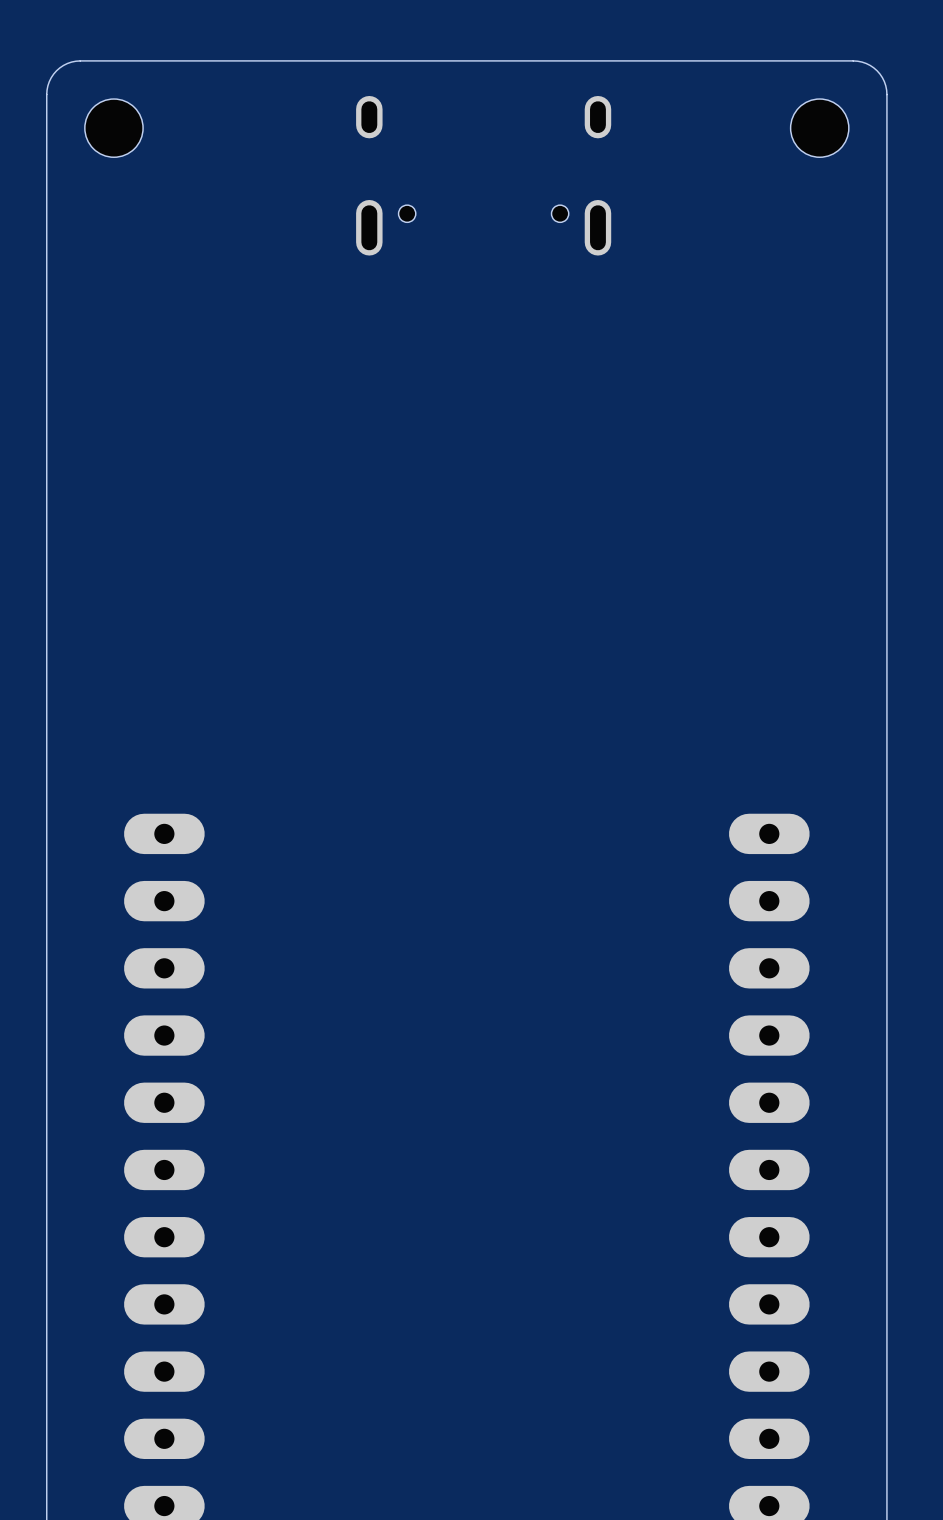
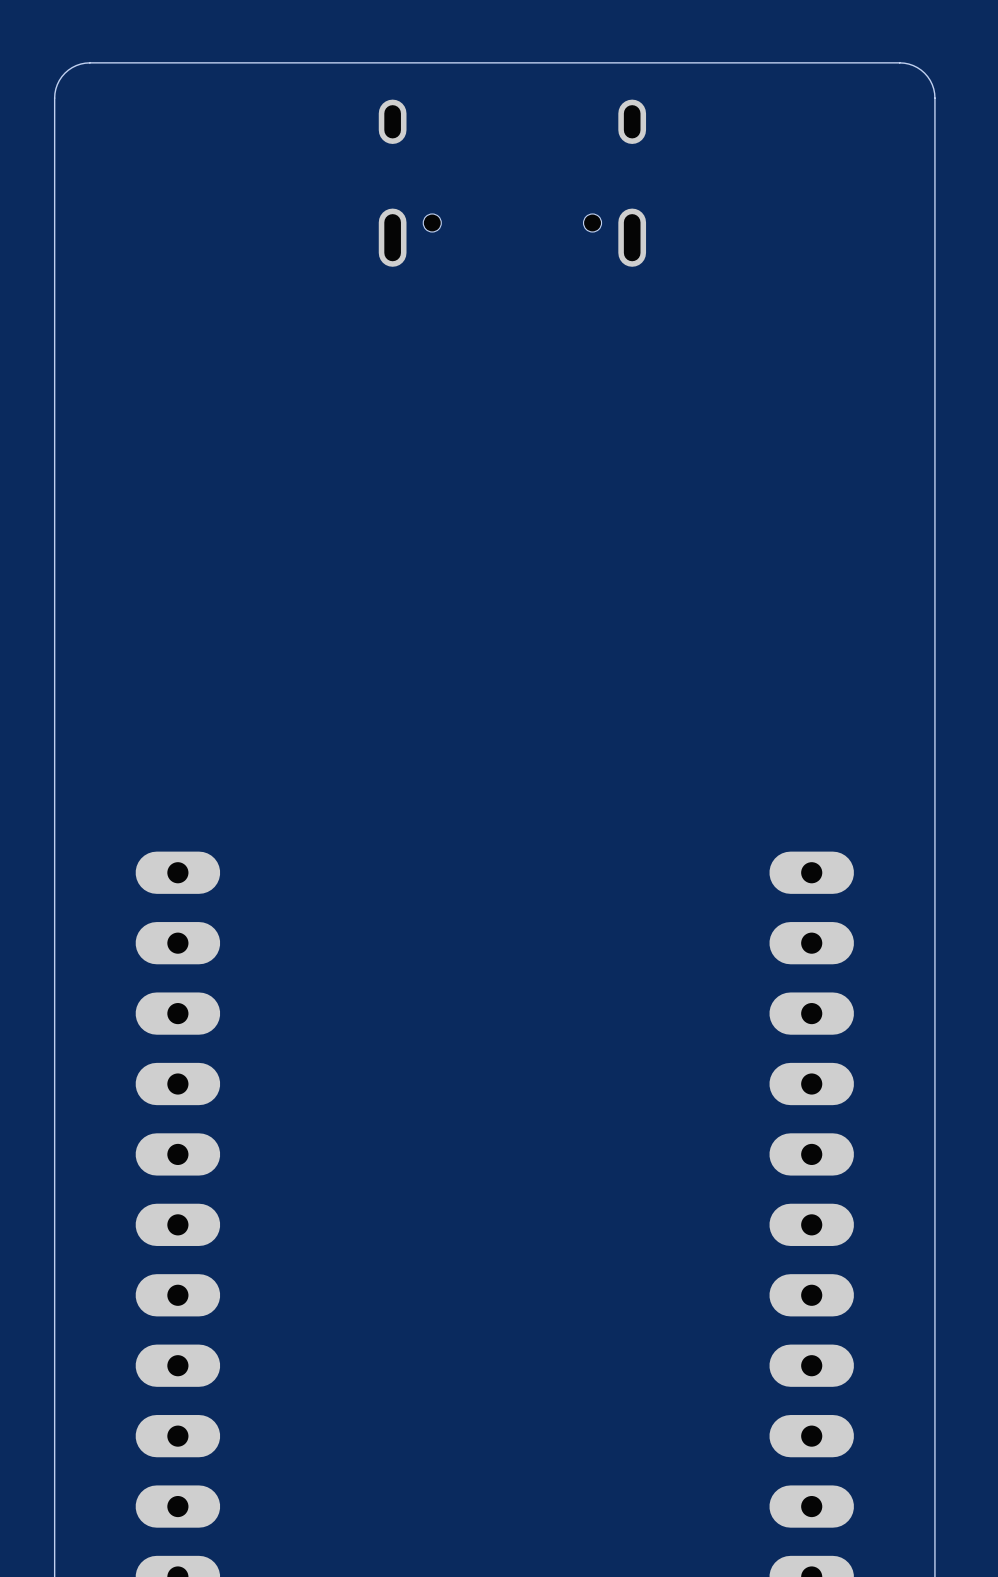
part: (113, 128) -> none
part: (819, 128) -> none

